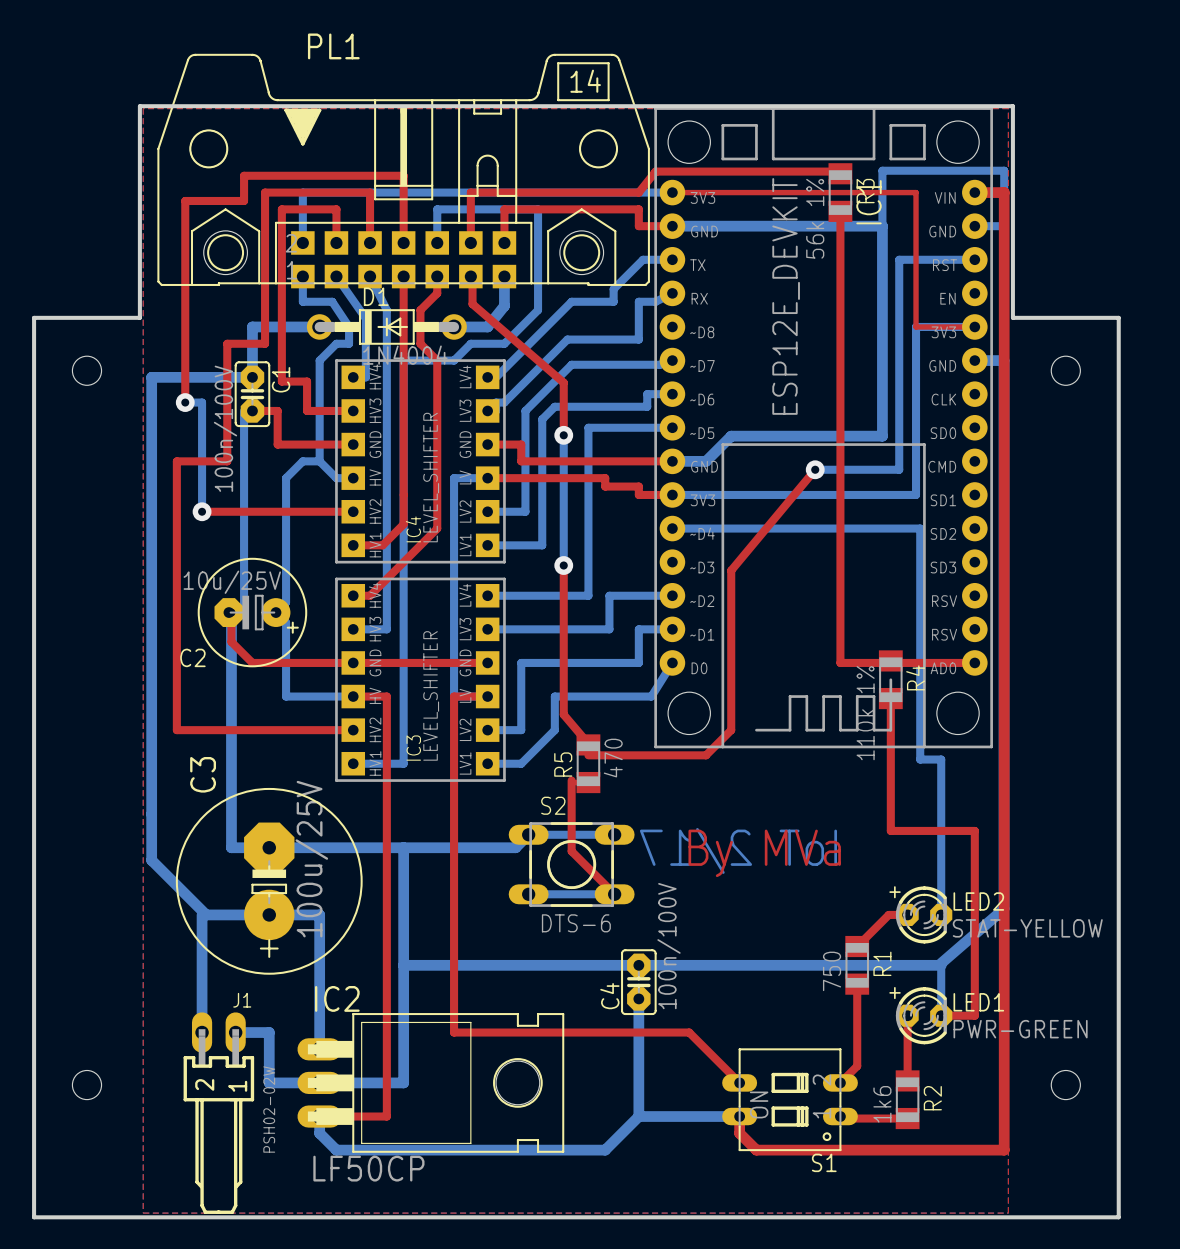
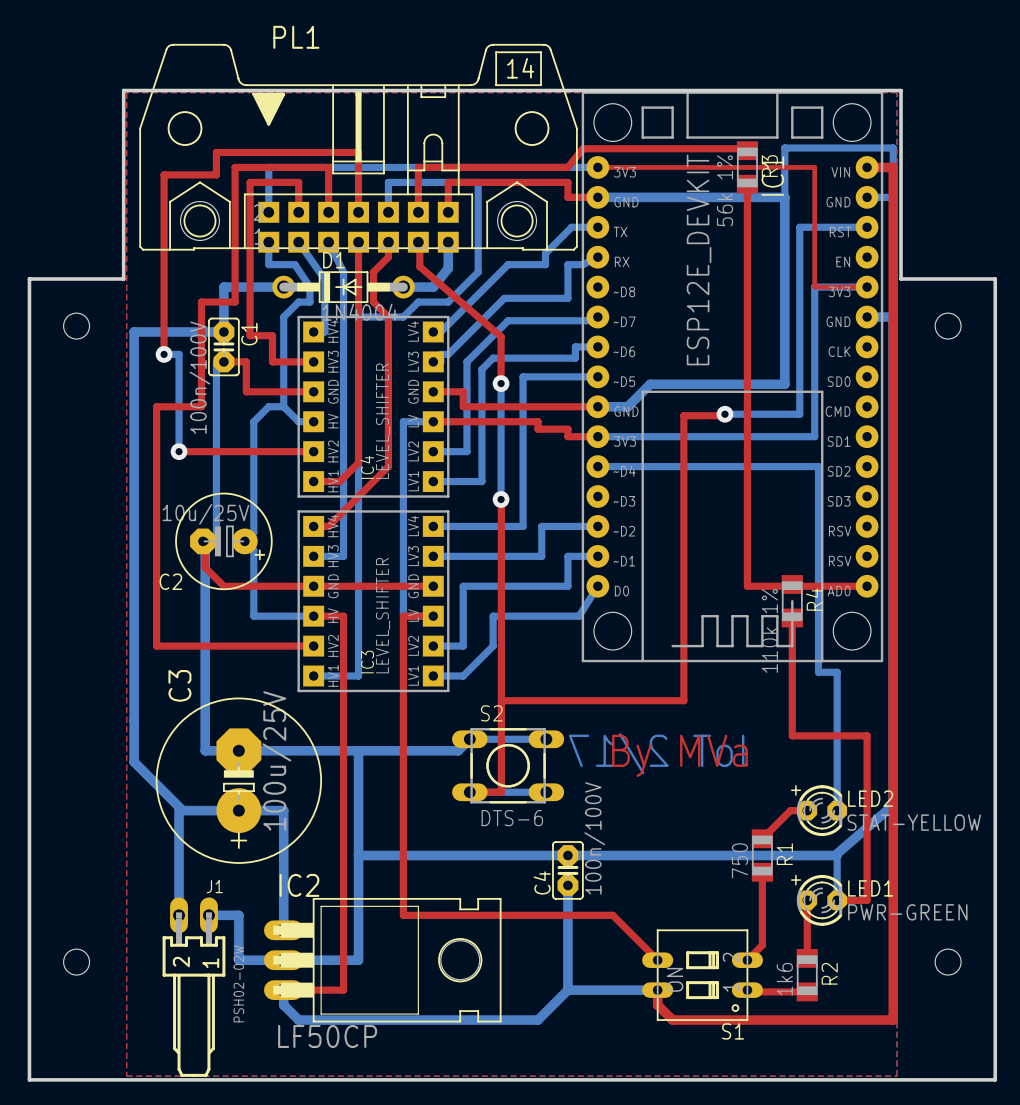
top track: (815, 469) (731, 570) (731, 730) (706, 755) (588, 755) (587, 742) (563, 714) (563, 565) -> (724, 414) (683, 415) (683, 700) (501, 700)
top track: none -> (501, 499) (501, 792) (469, 792)
R5: 470 (588, 763) -> none
top track: (588, 782) (573, 782) (571, 780) (571, 851) (614, 894) -> none

